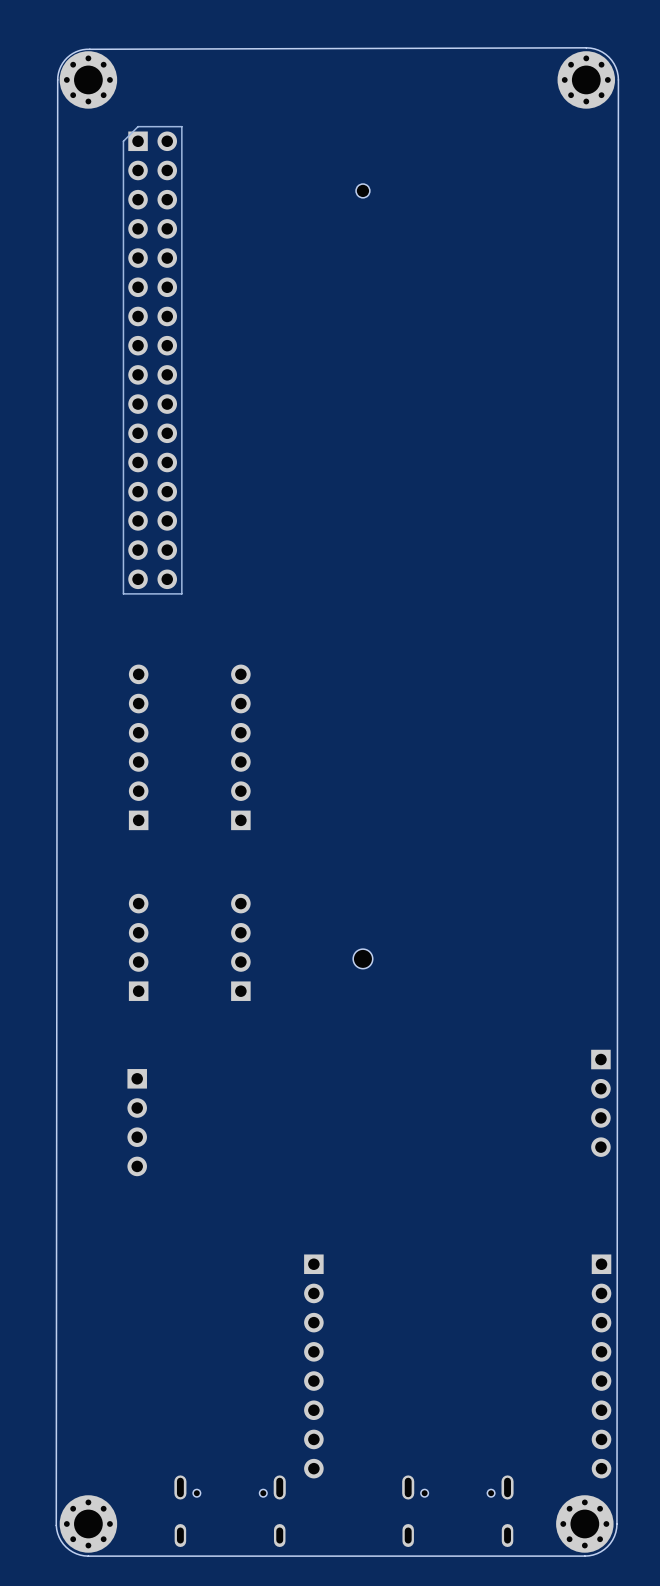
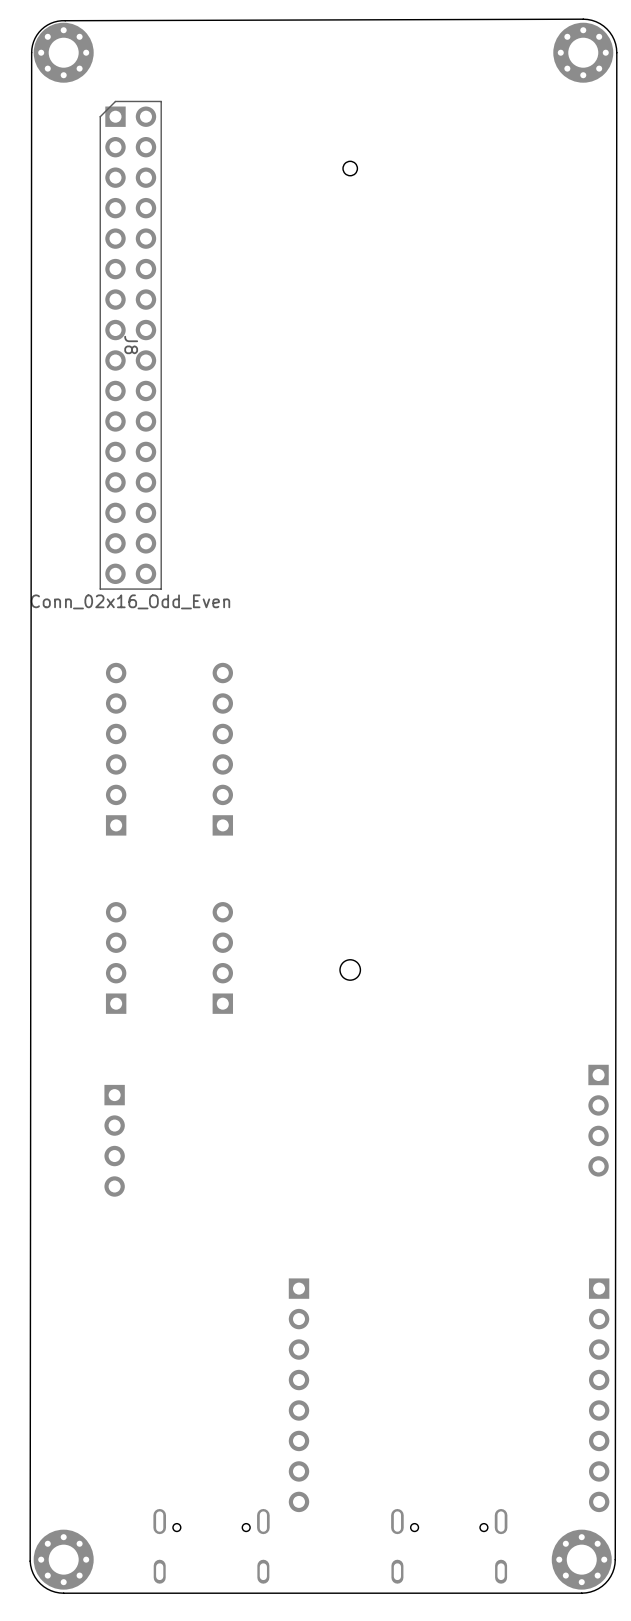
J8 name: none -> J8 (131, 344)
J8 value: none -> Conn_02x16_Odd_Even (130, 601)

